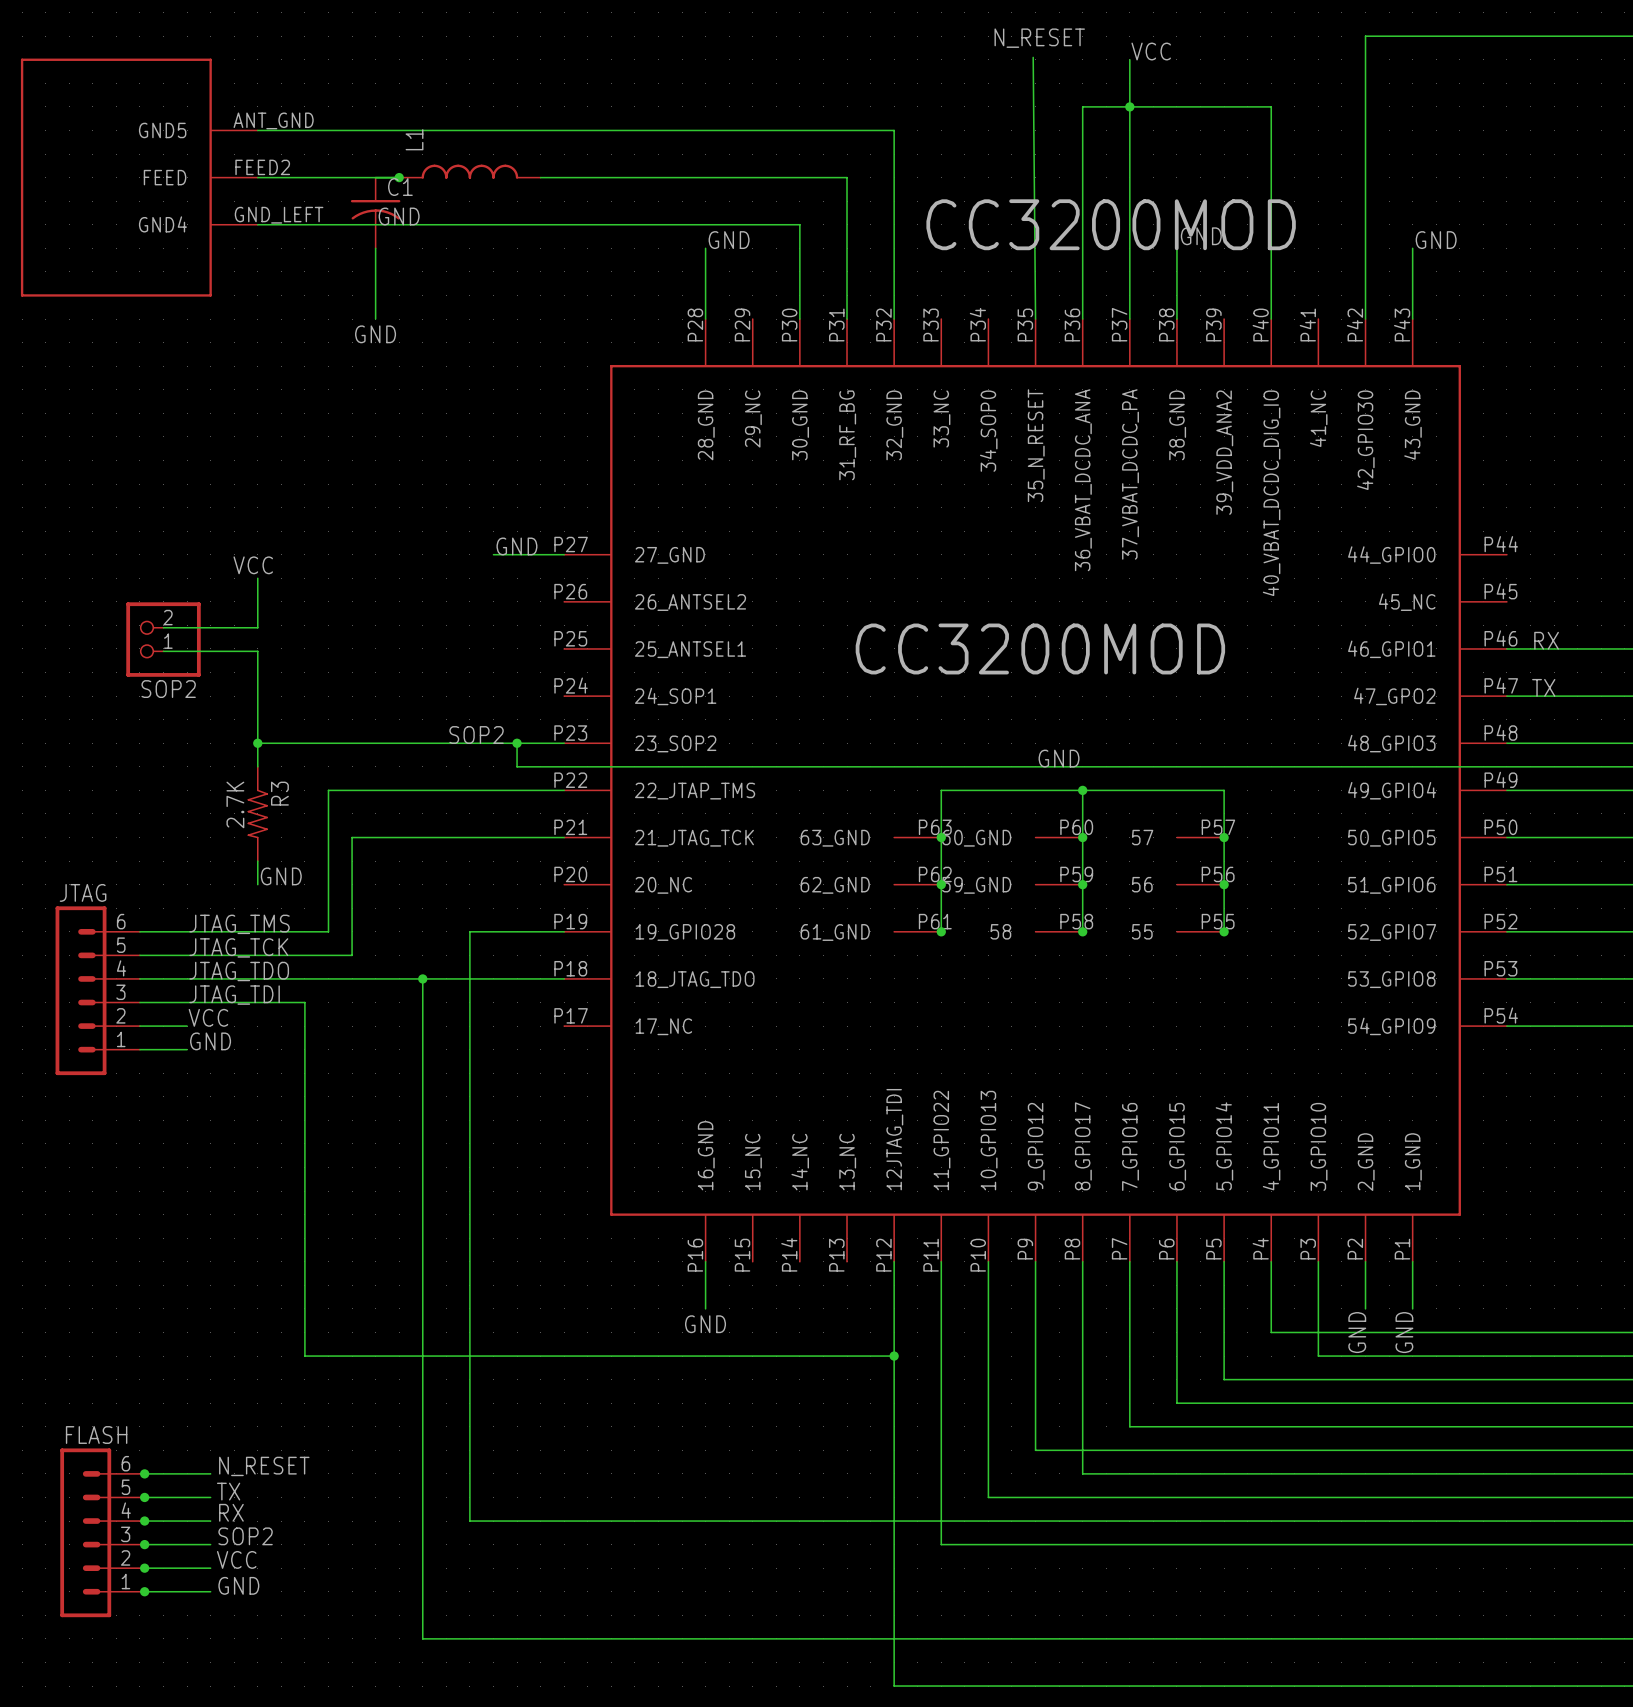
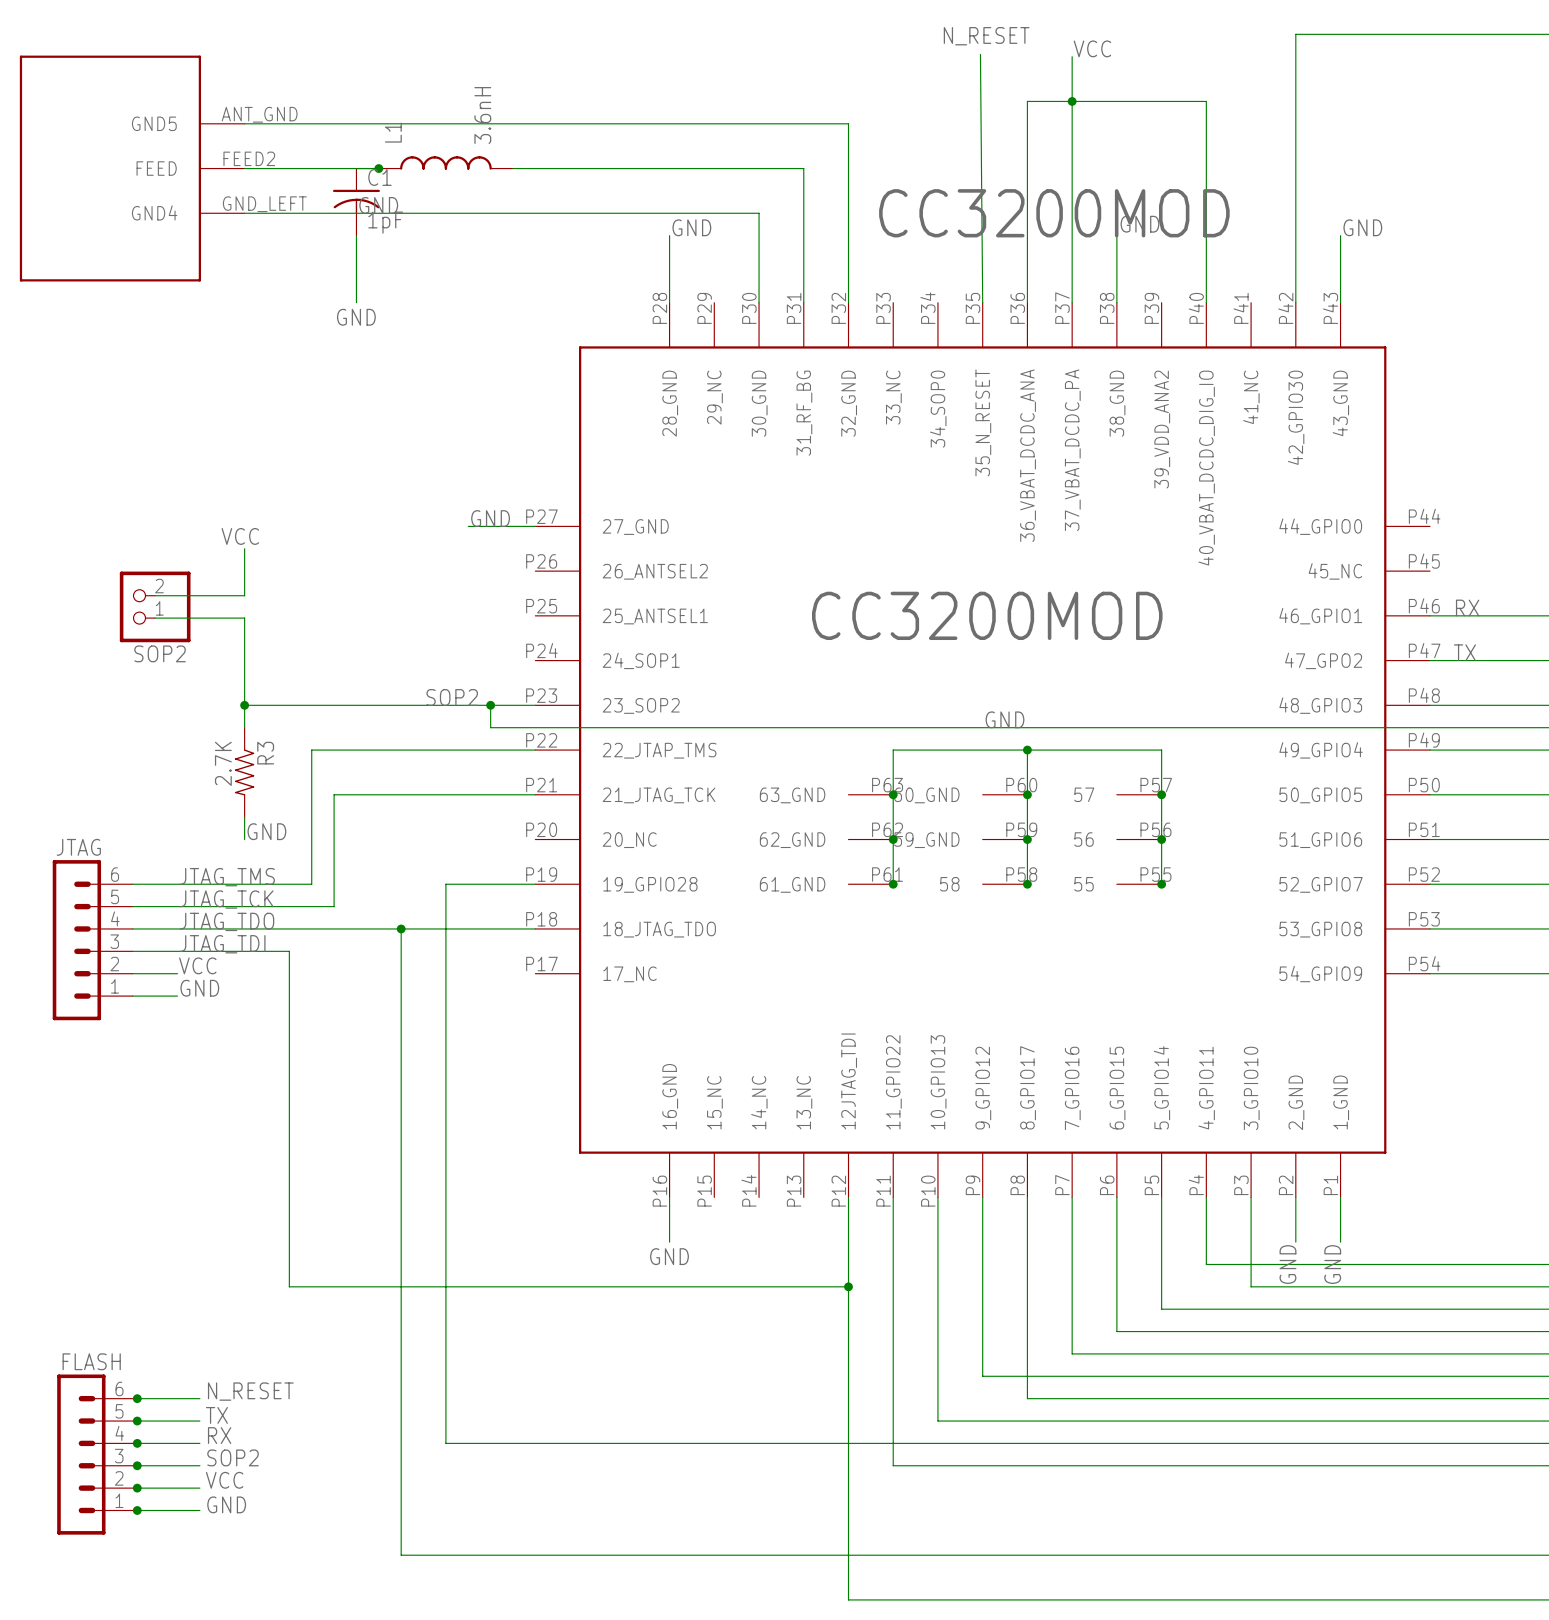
L1 value: none -> 3.6nH (482, 115)
C1 value: none -> 1pF (385, 222)

